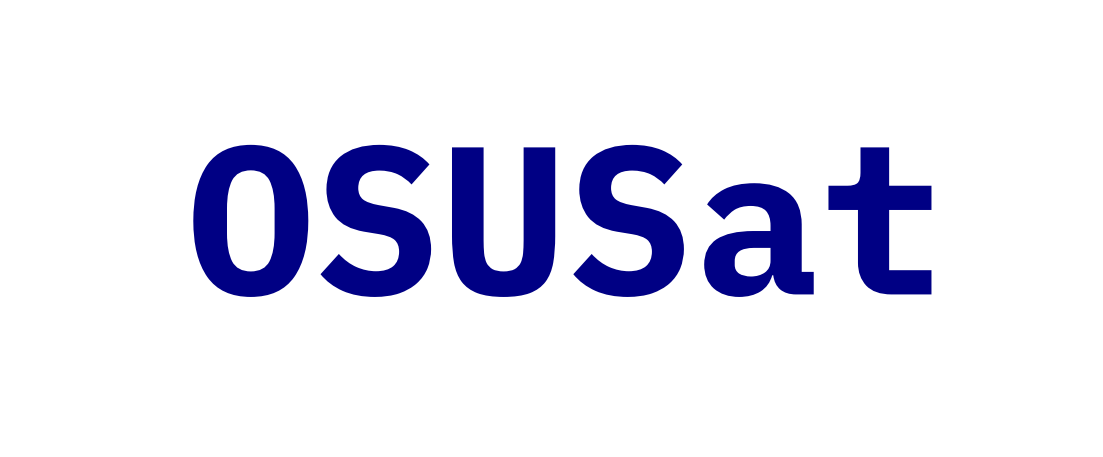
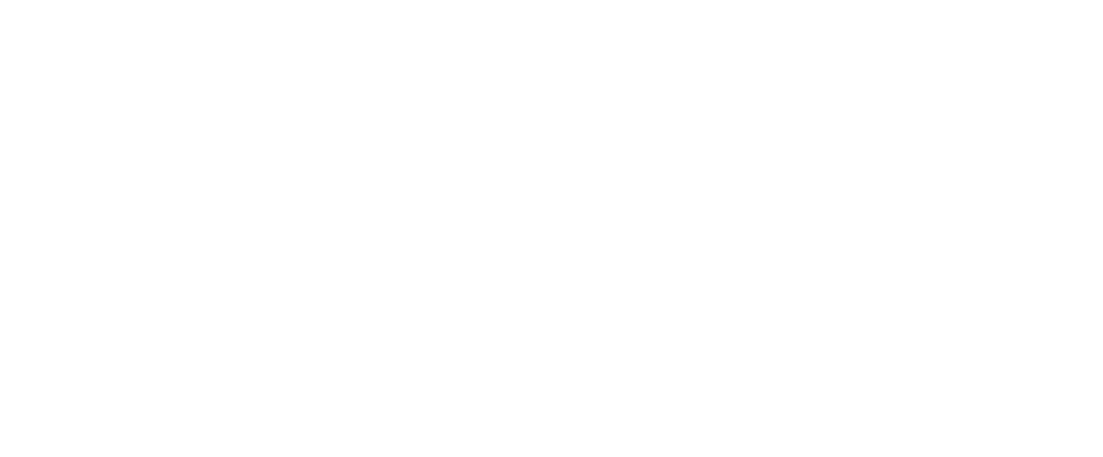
text: OSUSat (562, 220) -> none

